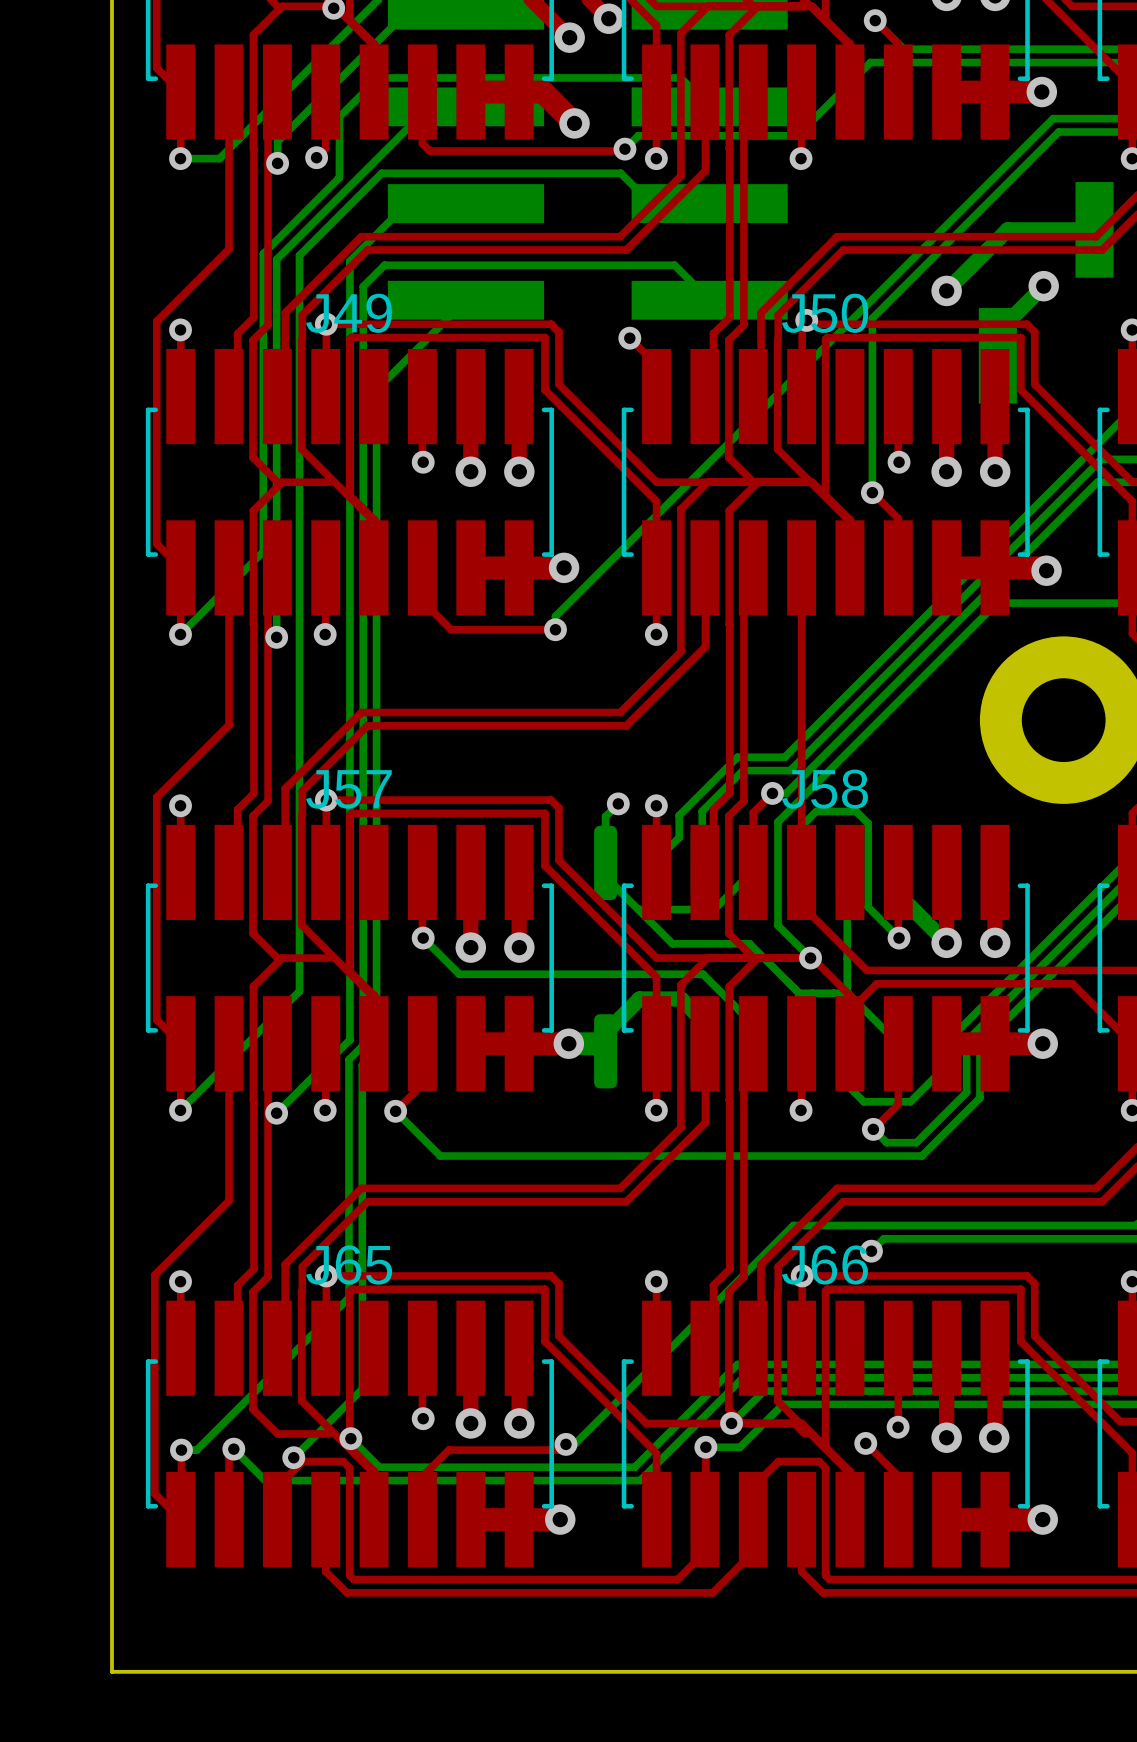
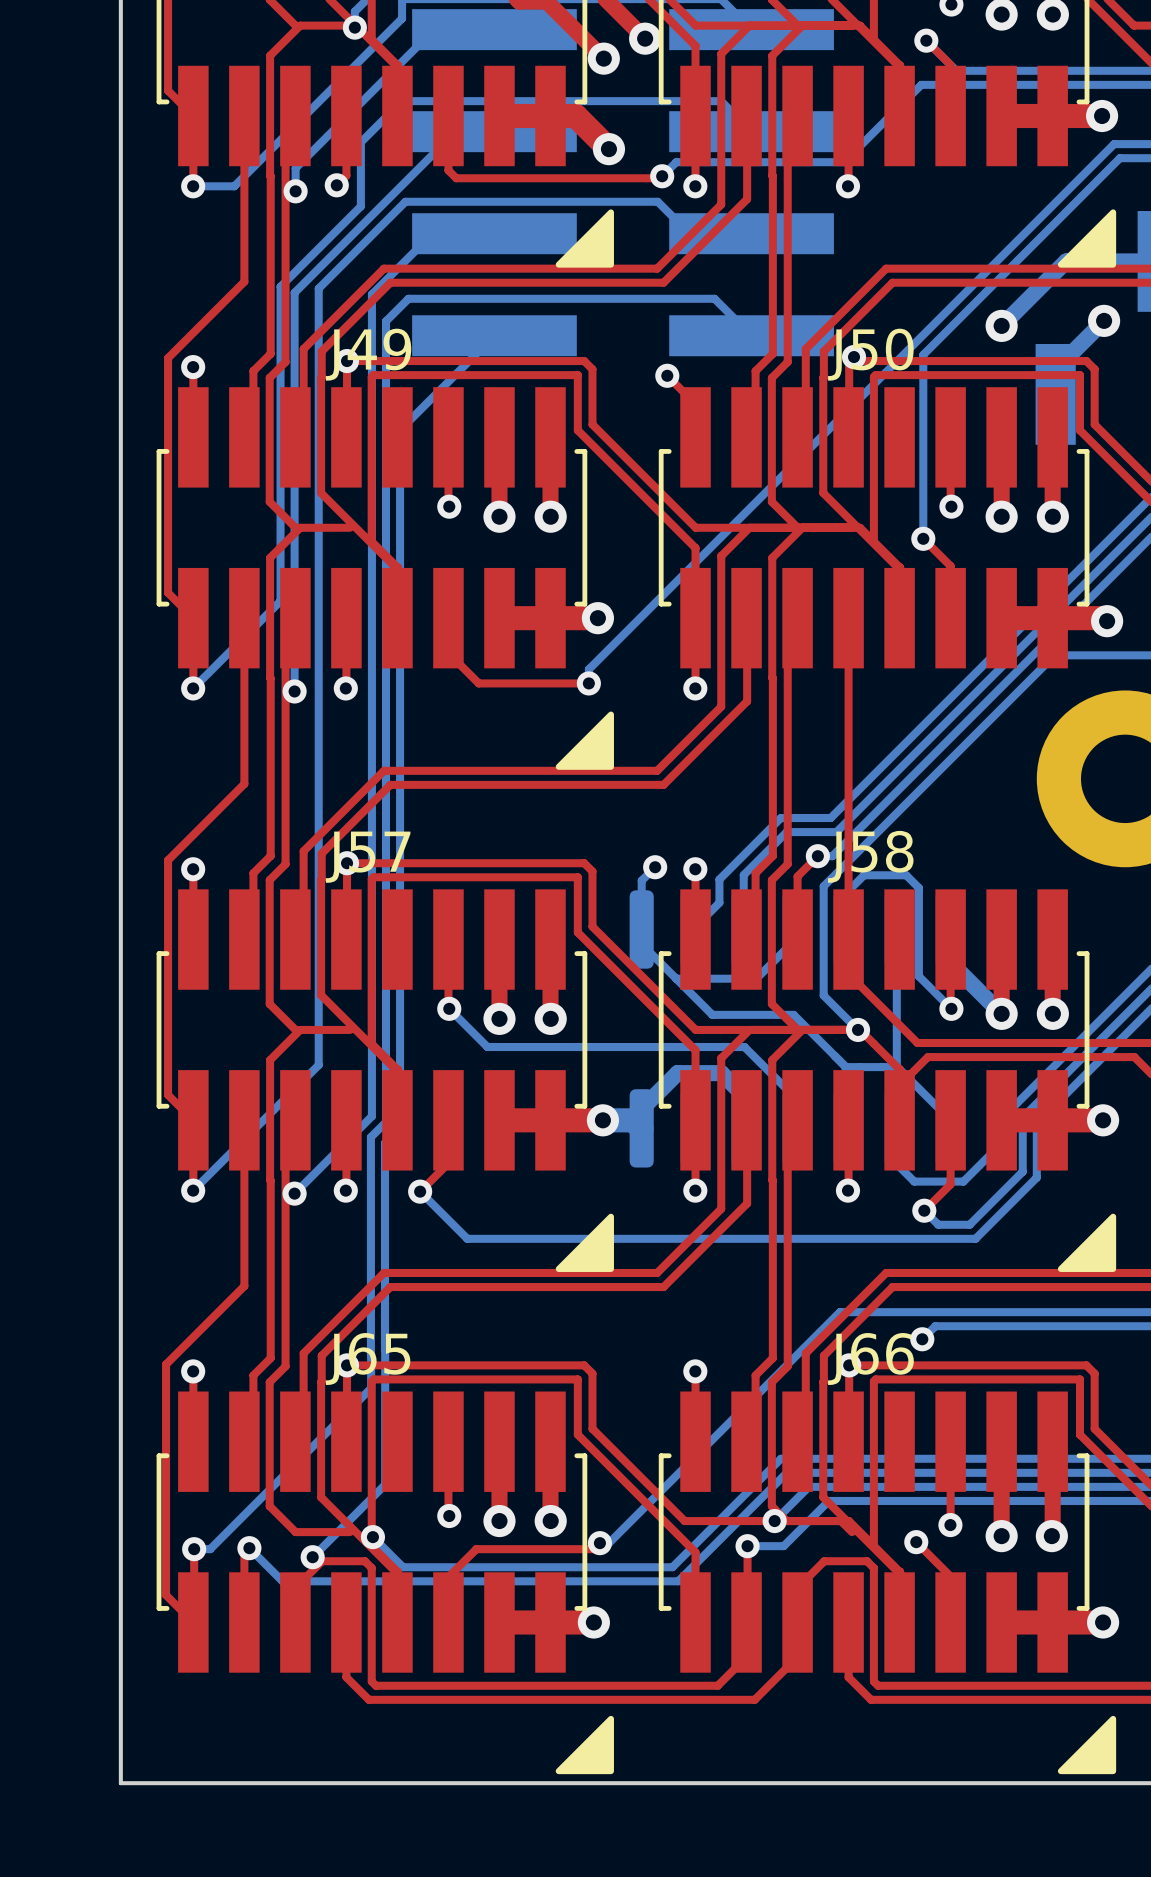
drawing: none -> [555, 209, 614, 268]
drawing: none -> [1057, 209, 1117, 268]
drawing: none -> [555, 711, 614, 770]
drawing: none -> [555, 1213, 614, 1272]
drawing: none -> [1057, 1213, 1117, 1272]
drawing: none -> [555, 1715, 614, 1775]
drawing: none -> [1057, 1715, 1117, 1775]

